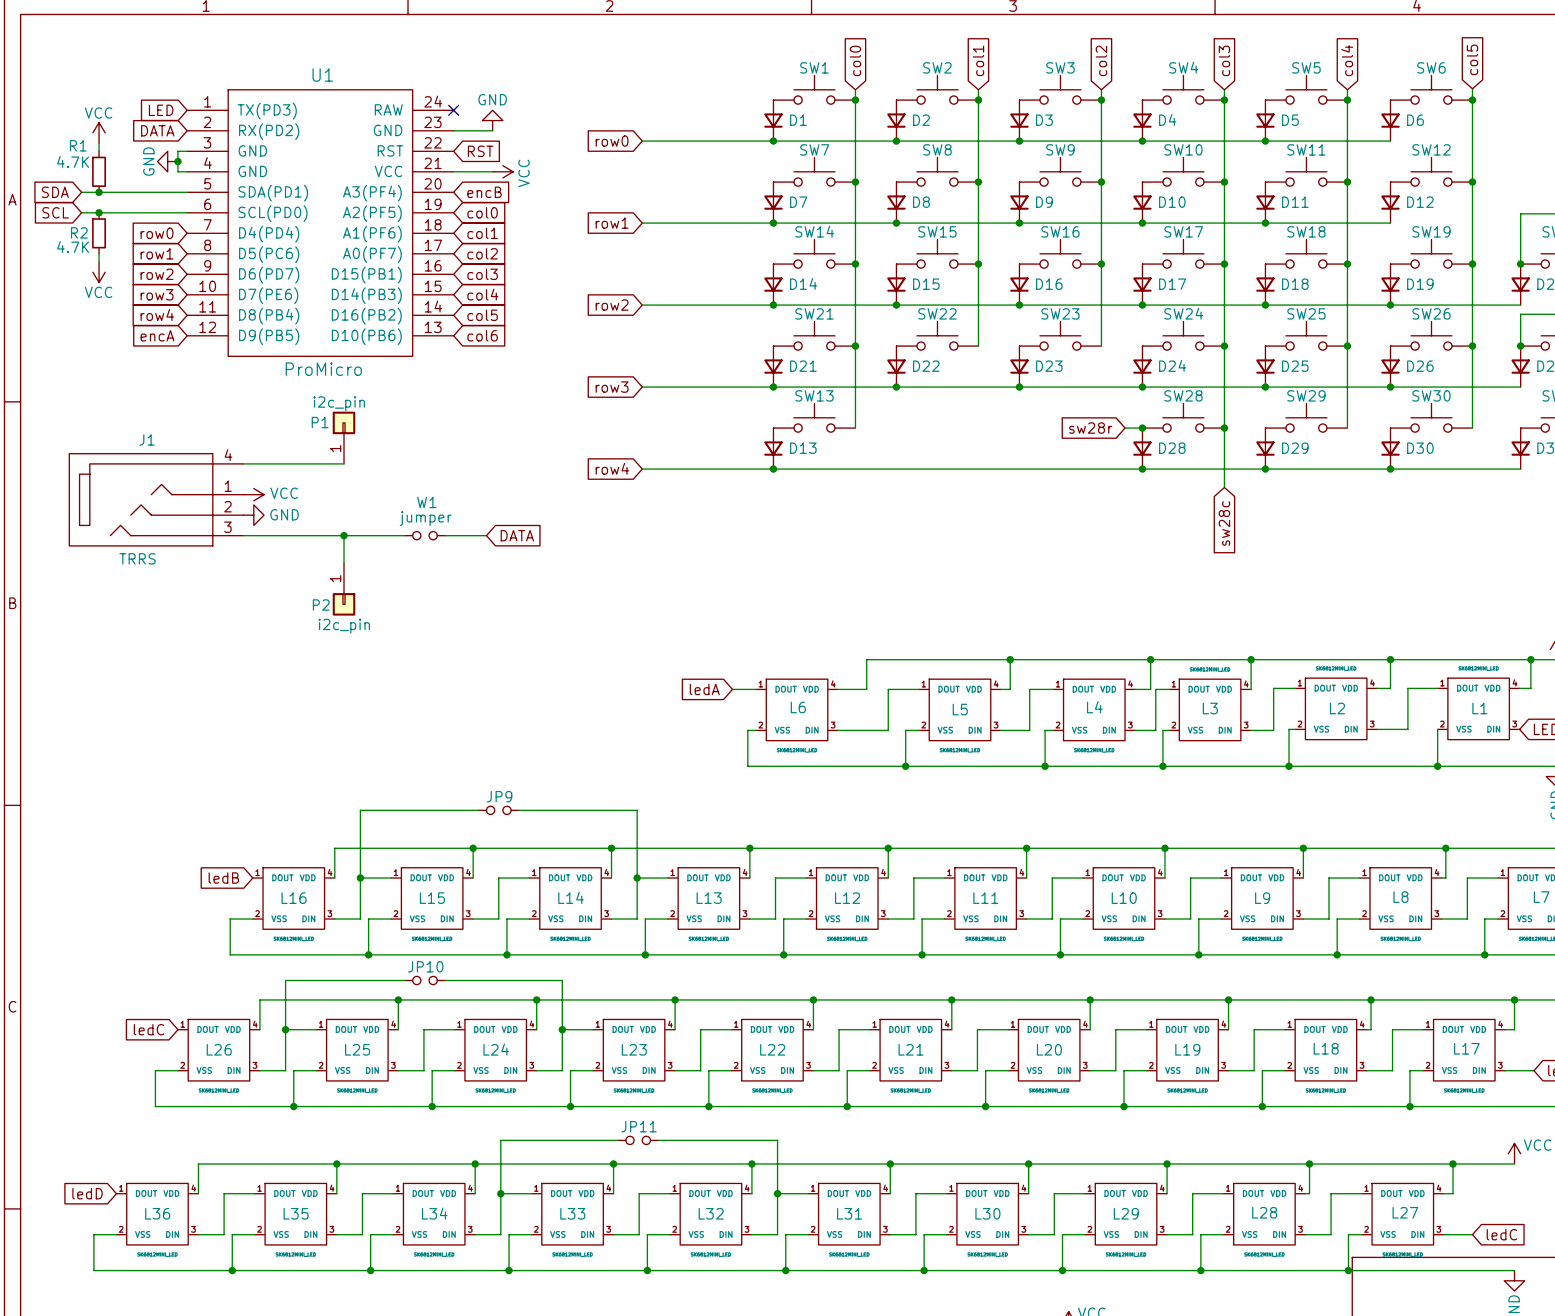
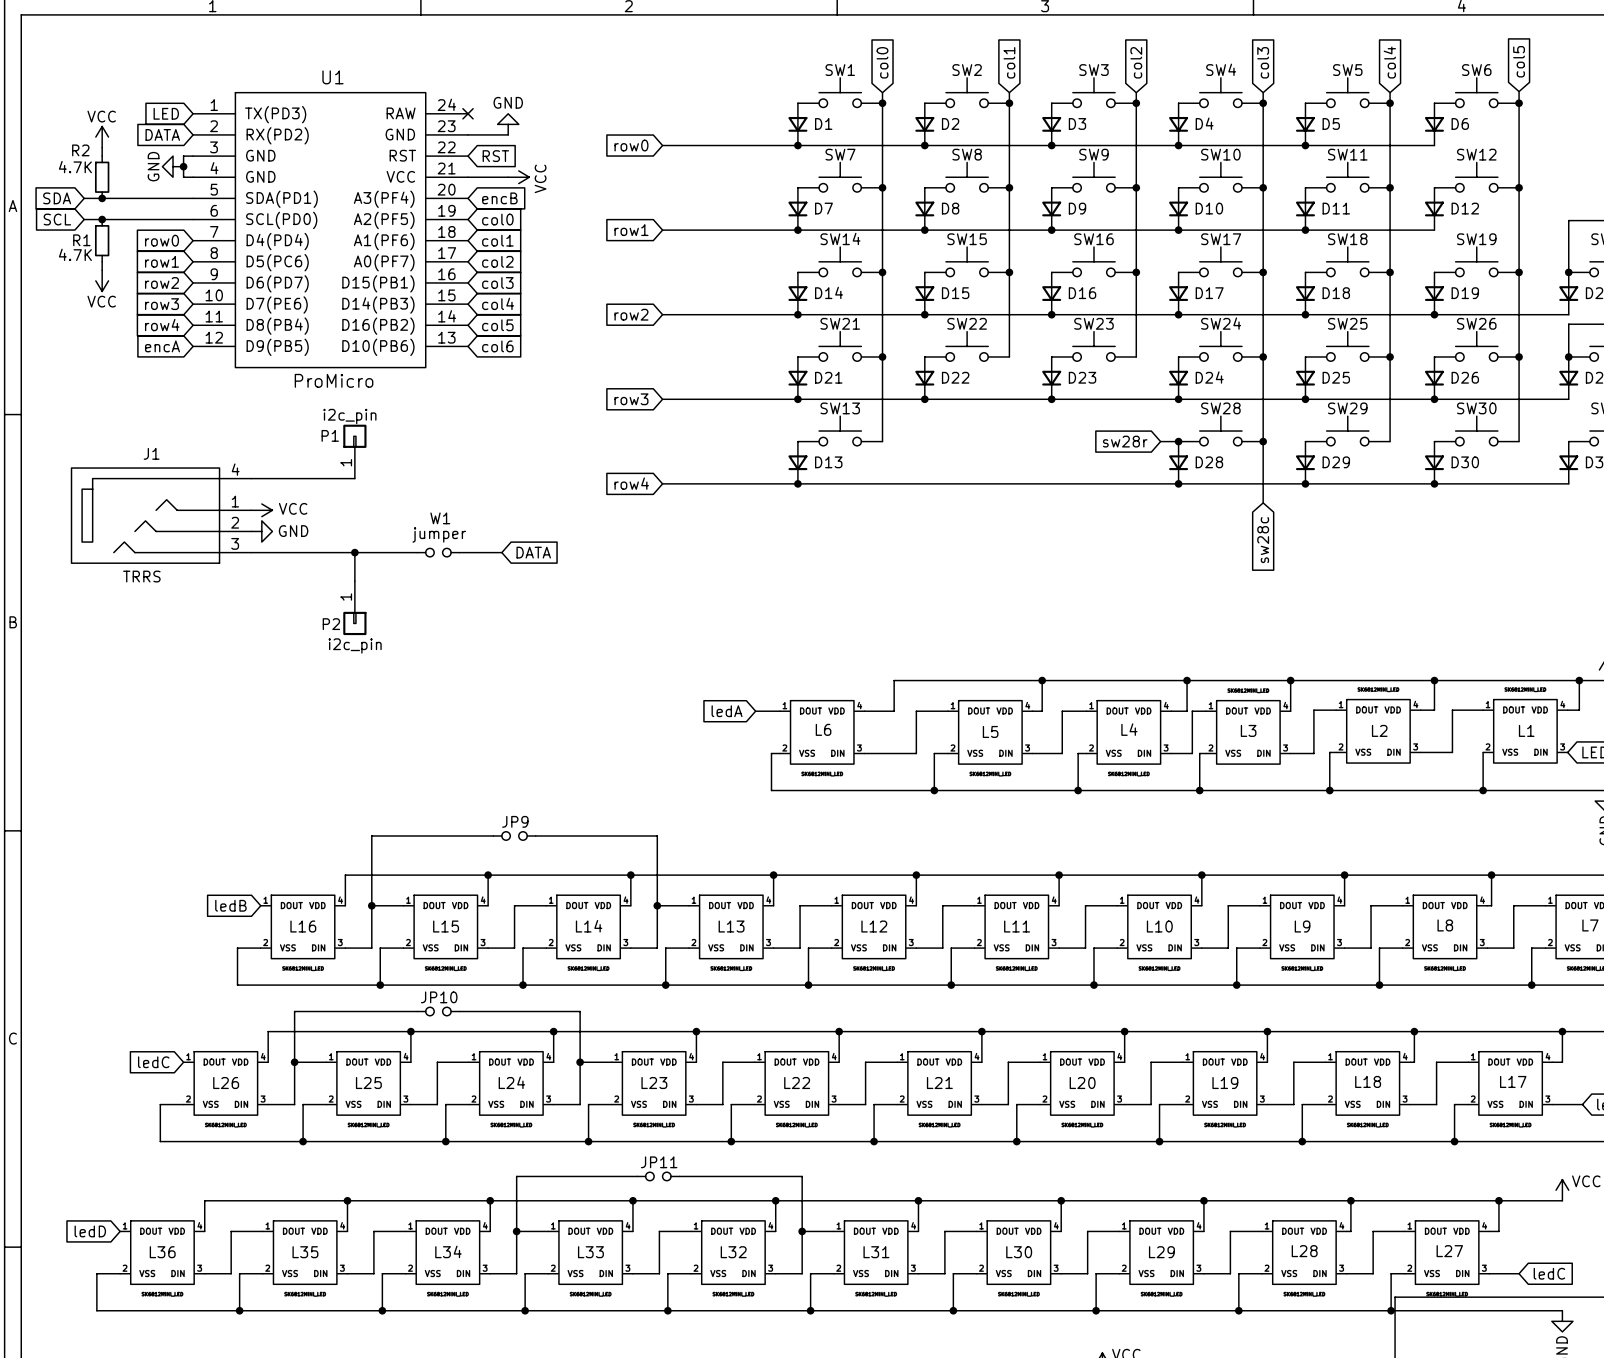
R1 name: R1 (78, 145) -> R2 (80, 150)
R2 name: R2 (79, 232) -> R1 (81, 240)

